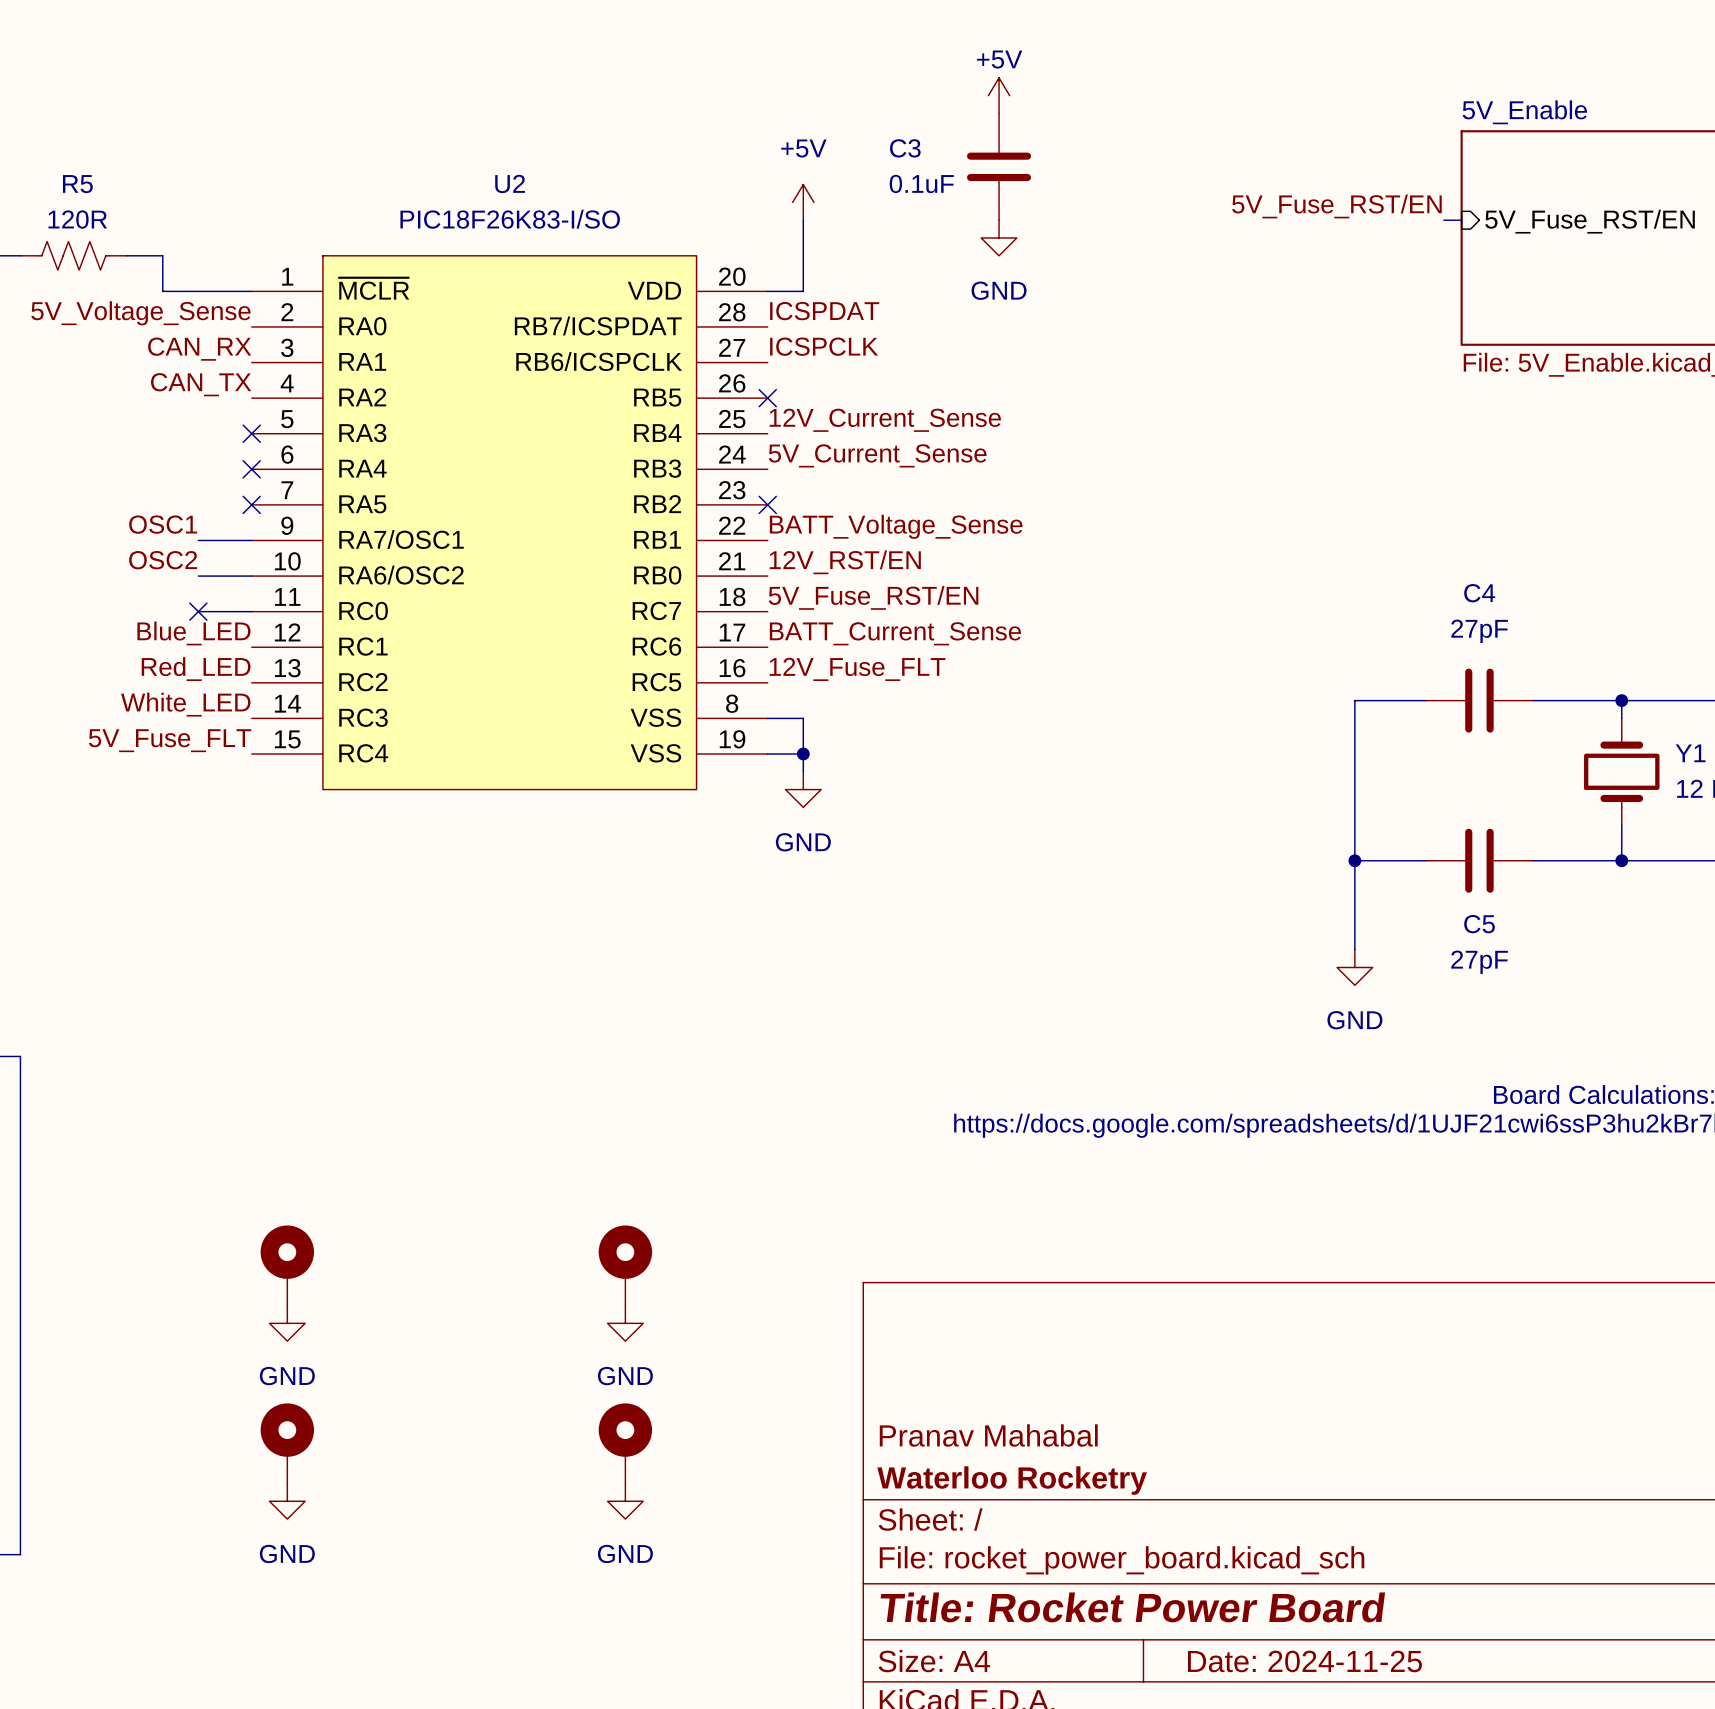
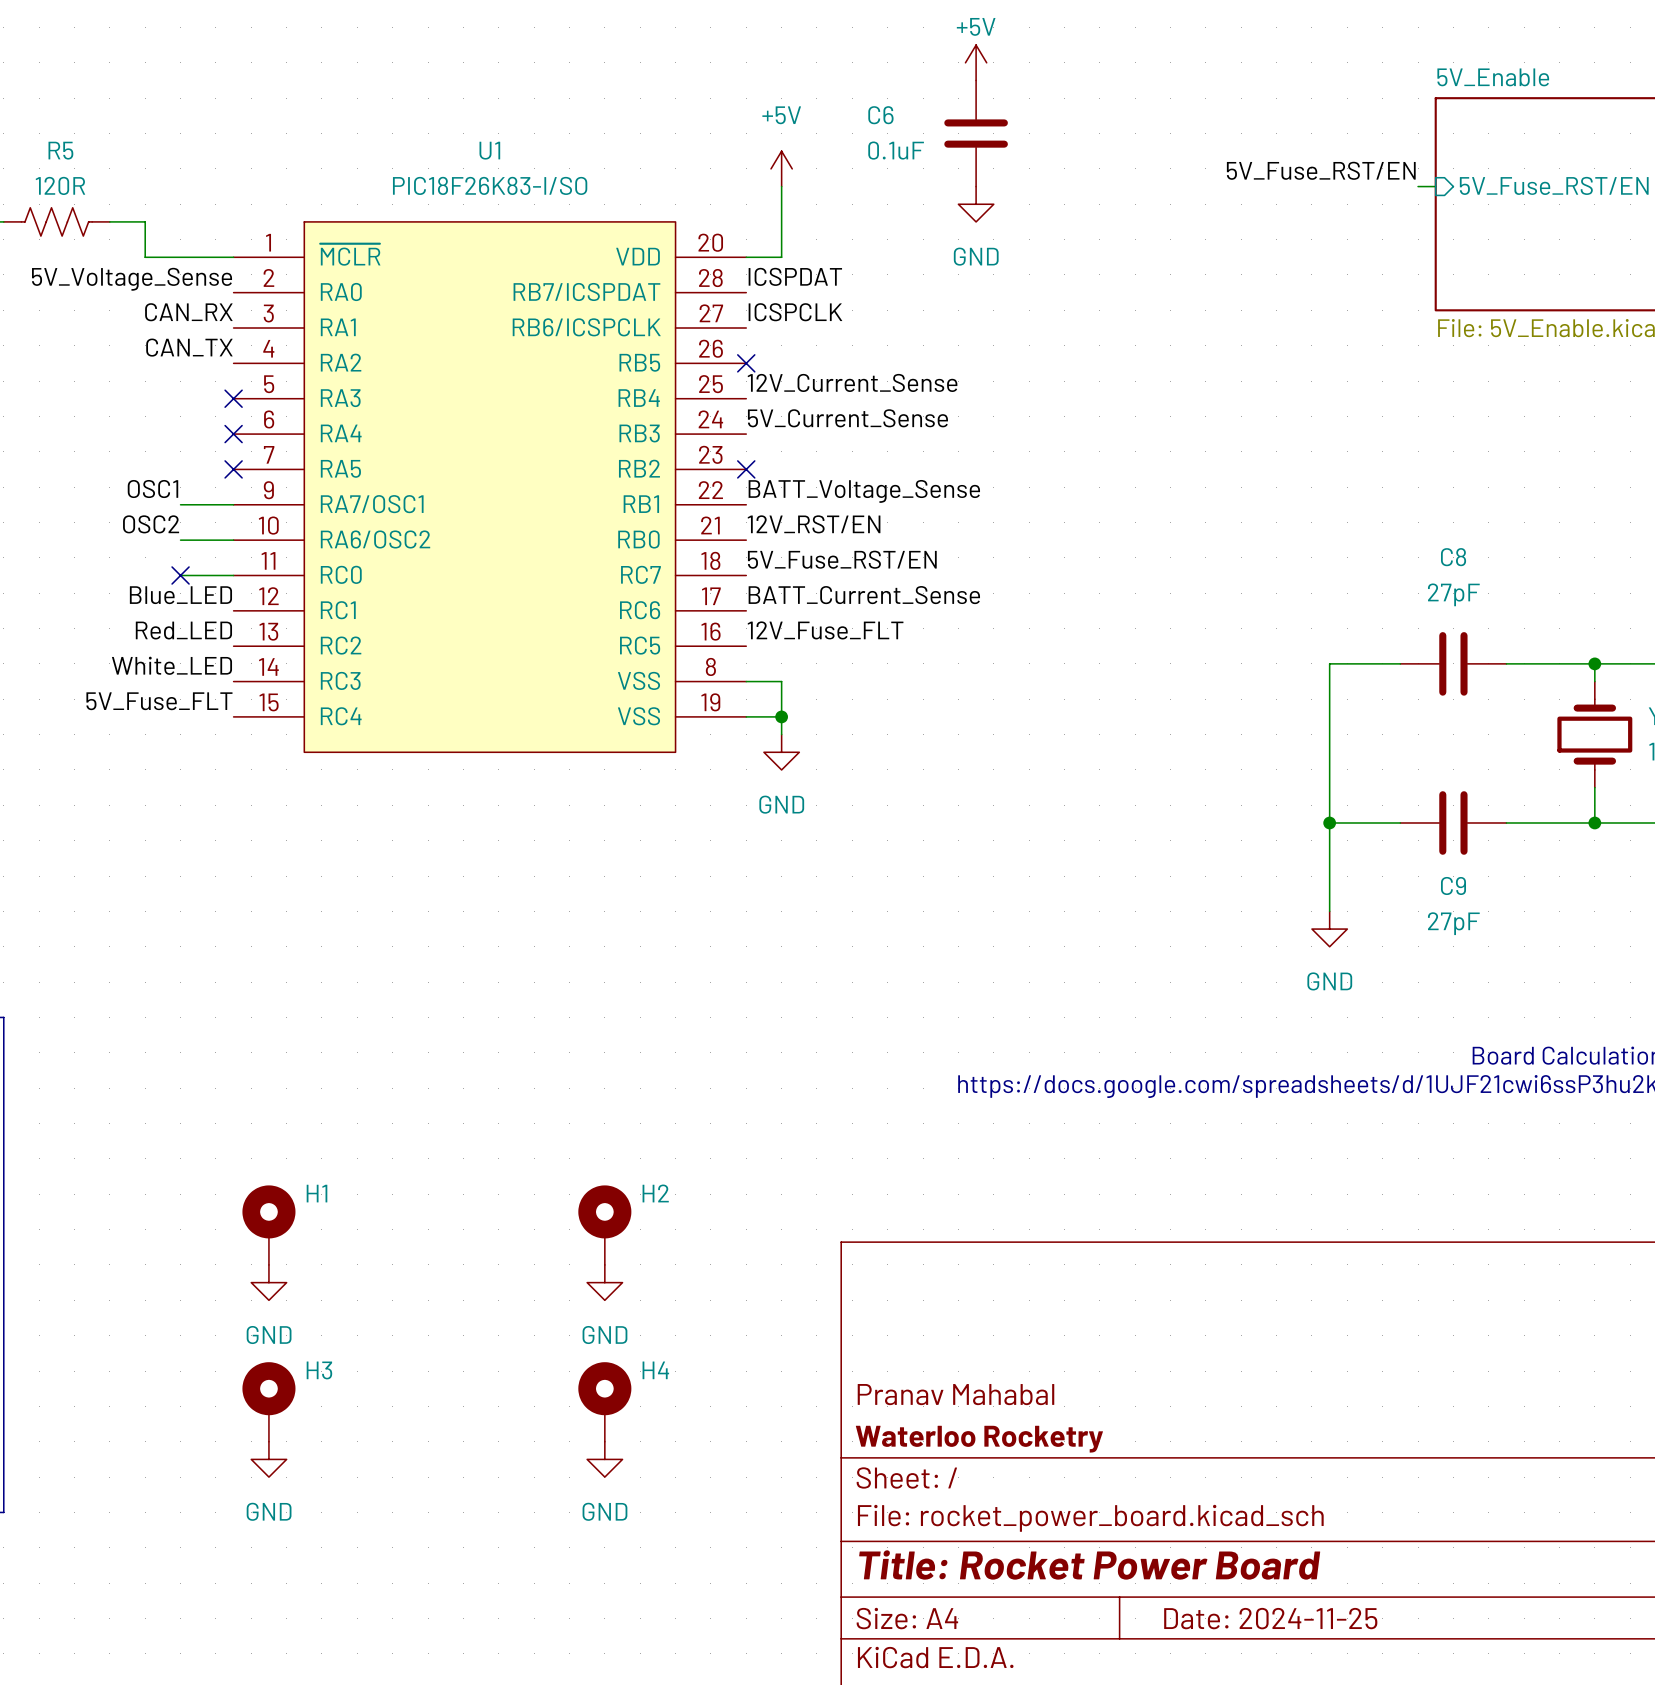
C3 name: C3 (905, 148) -> C6 (880, 115)
U2 name: U2 (510, 183) -> U1 (489, 150)
C4 name: C4 (1479, 593) -> C8 (1453, 557)
C5 name: C5 (1479, 924) -> C9 (1453, 885)
H1 name: none -> H1 (317, 1193)
H2 name: none -> H2 (655, 1193)
H3 name: none -> H3 (319, 1370)
H4 name: none -> H4 (655, 1370)

